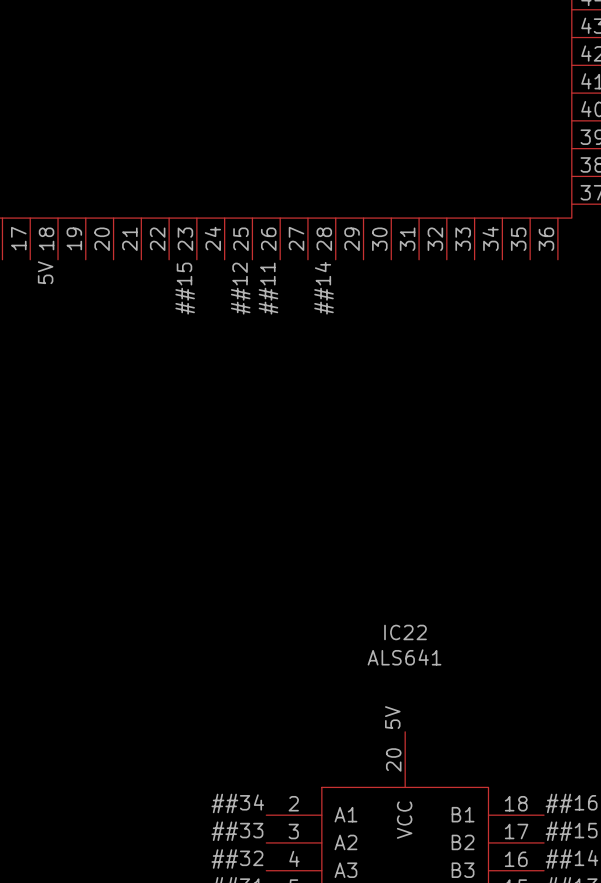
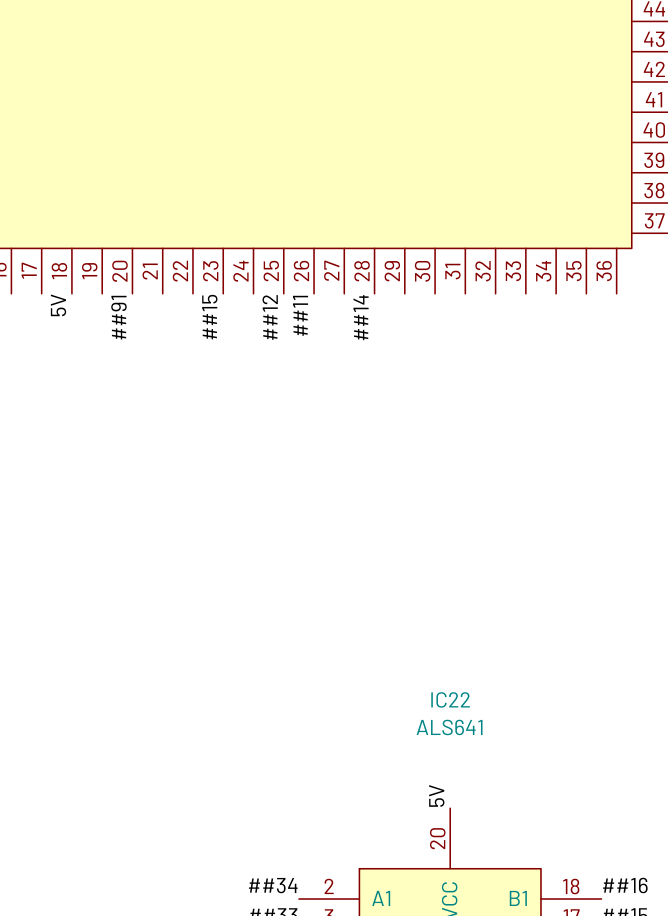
label: none -> ##91 (118, 317)

